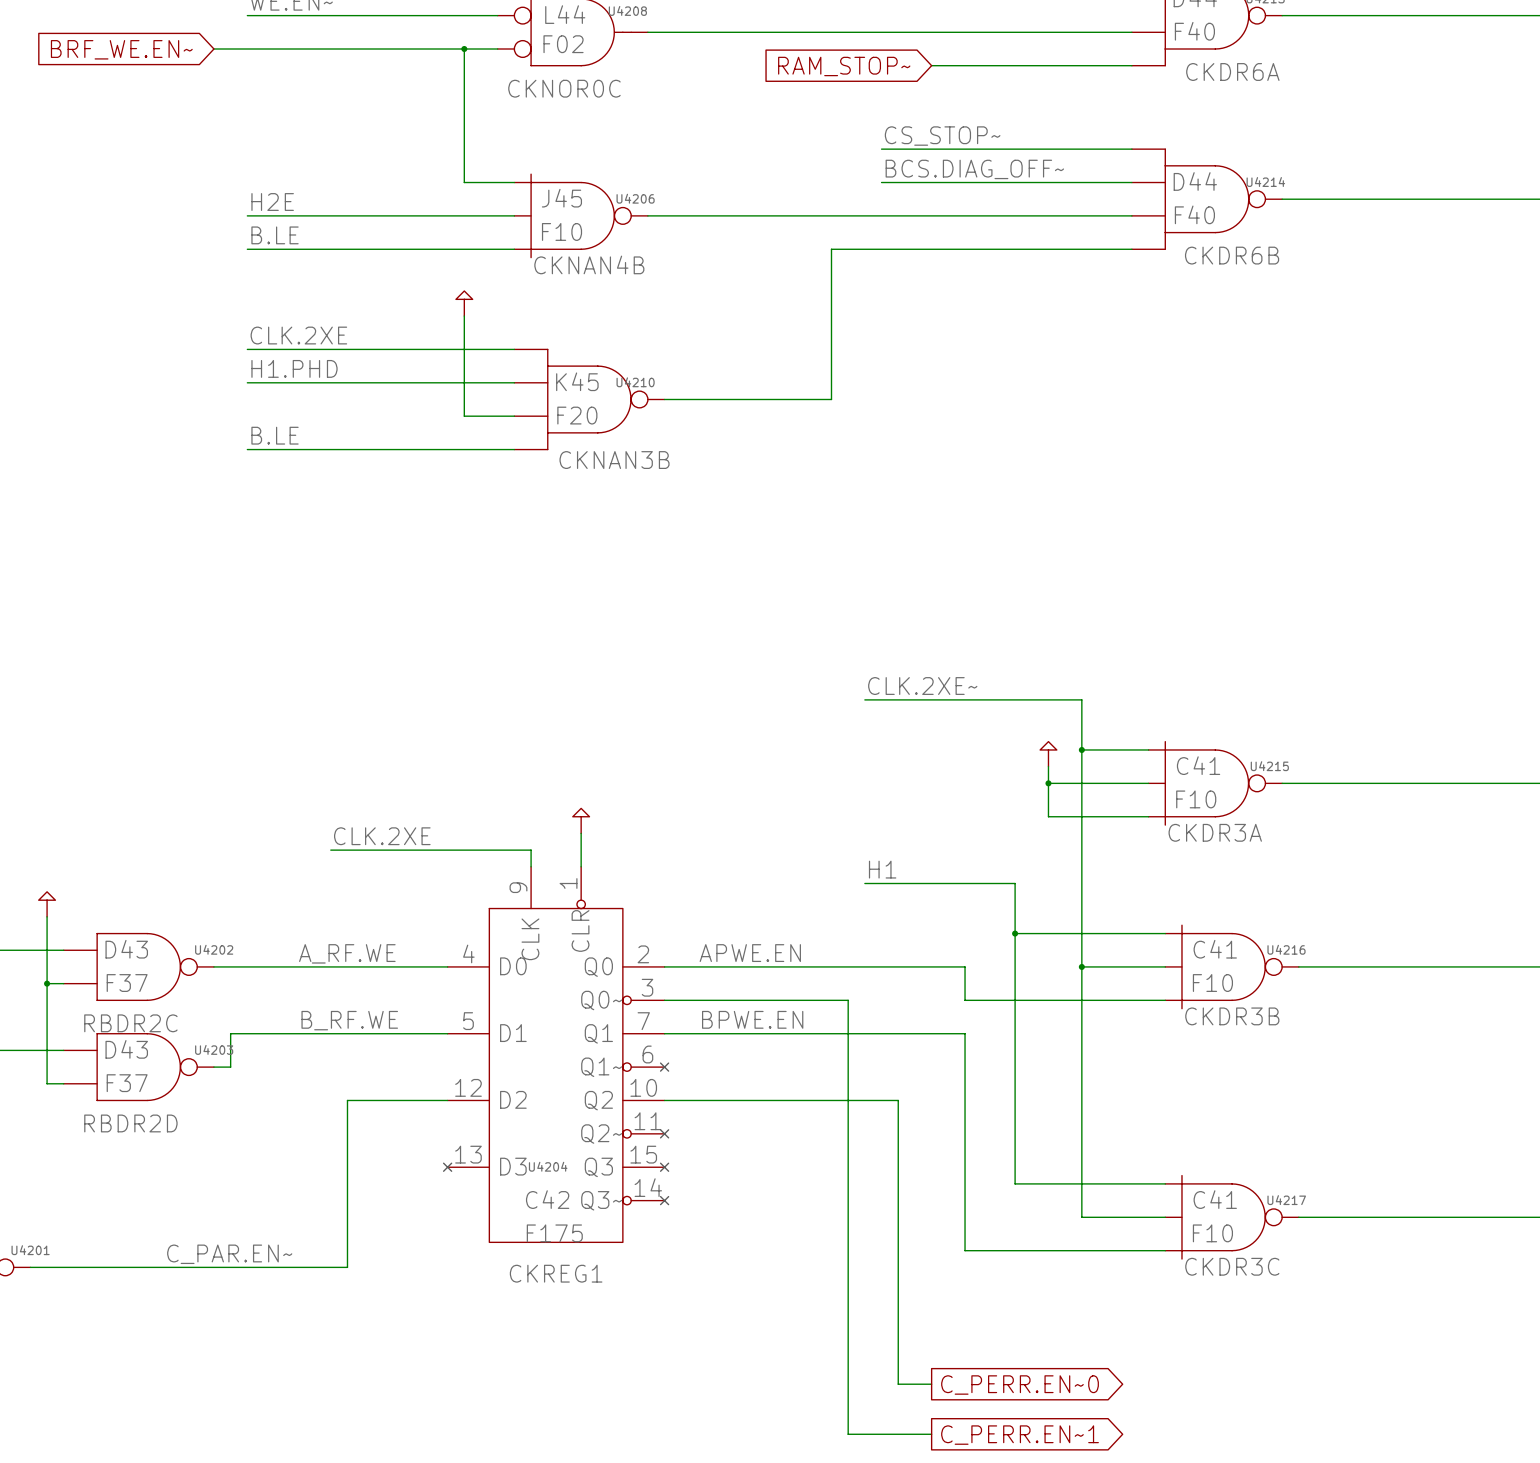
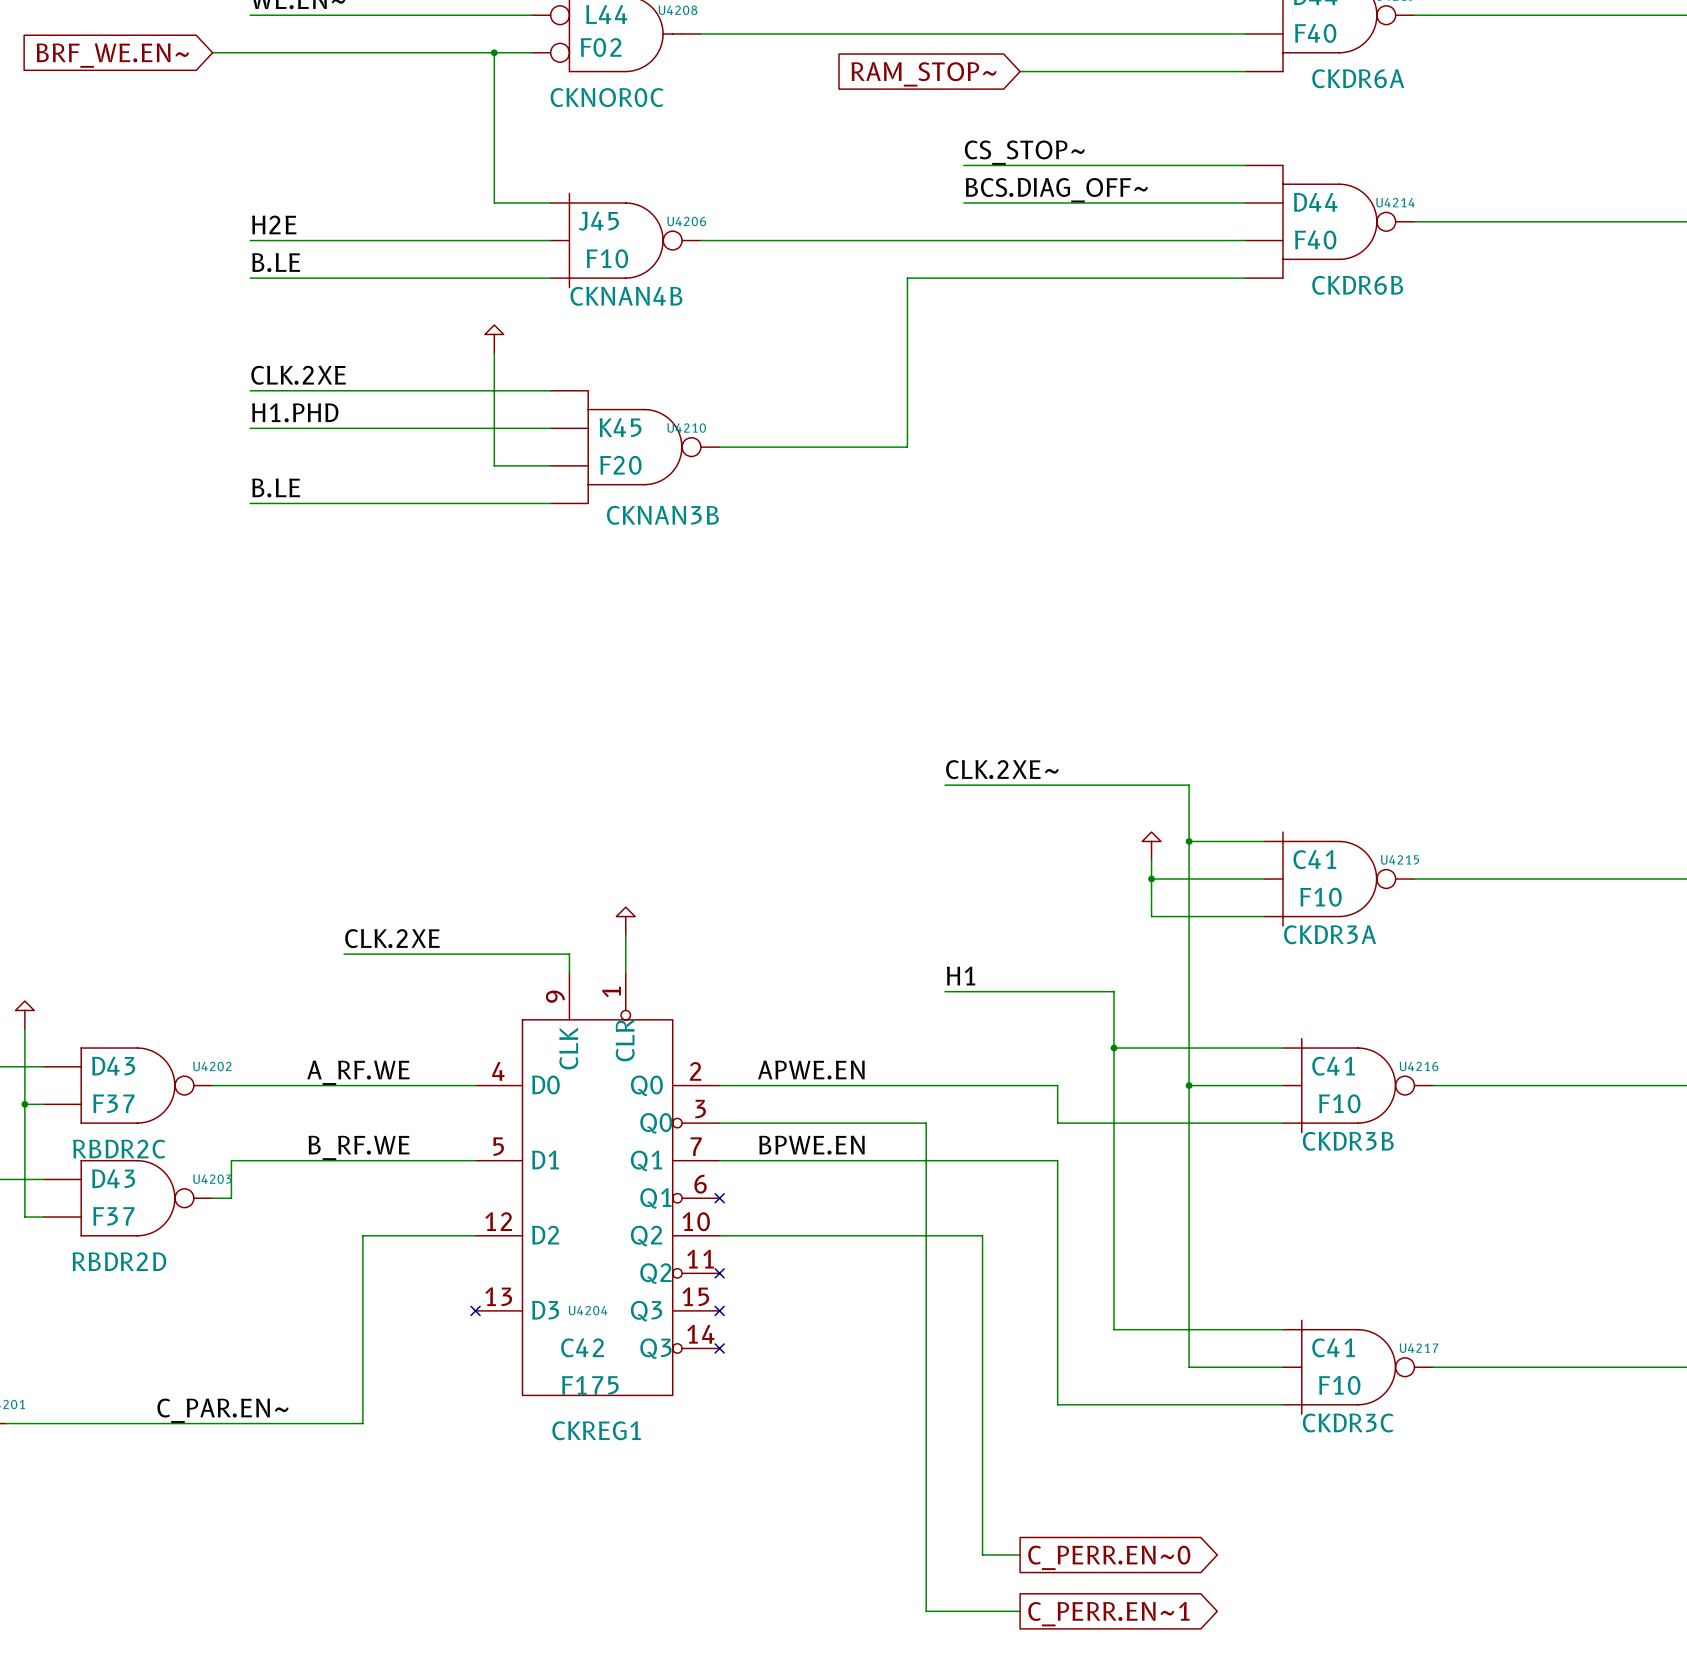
U4204 pin name: Q0~ (601, 1000) -> Q0 (656, 1123)
U4204 pin name: Q1~ (601, 1067) -> Q1 (655, 1198)
U4204 pin name: Q2~ (601, 1134) -> Q2 (655, 1273)
U4204 pin name: Q3~ (601, 1200) -> Q3 (655, 1348)

